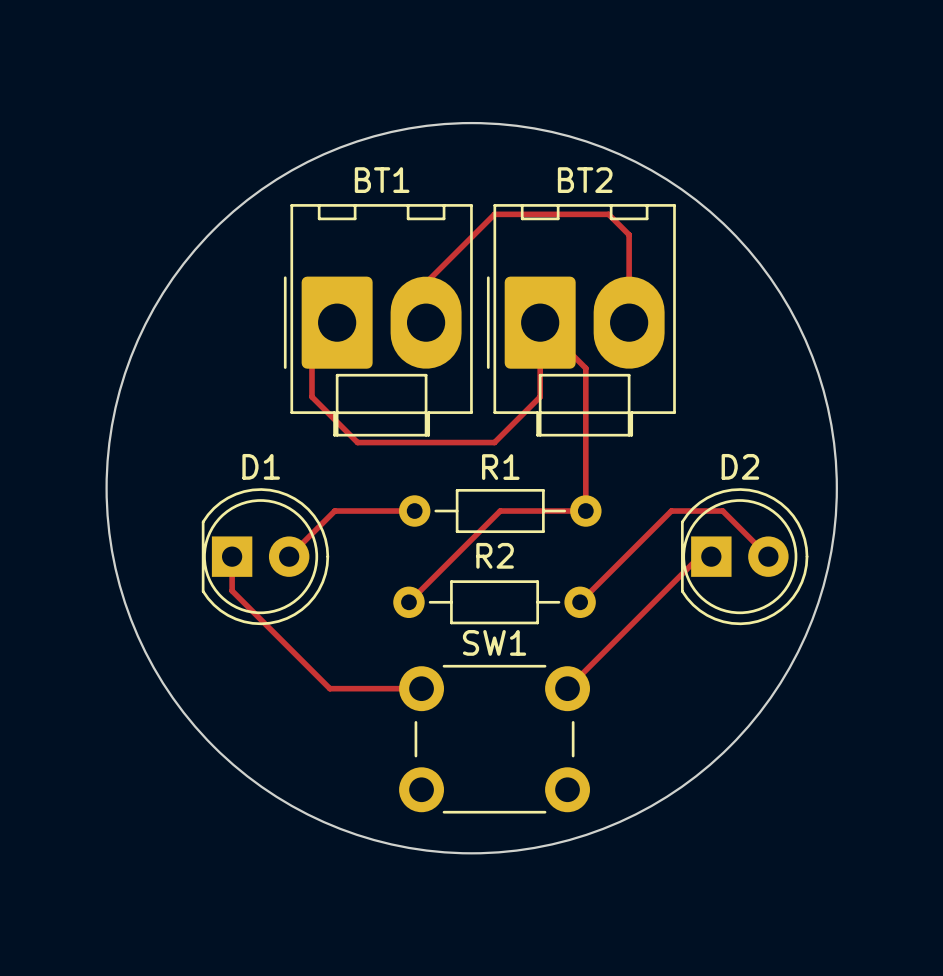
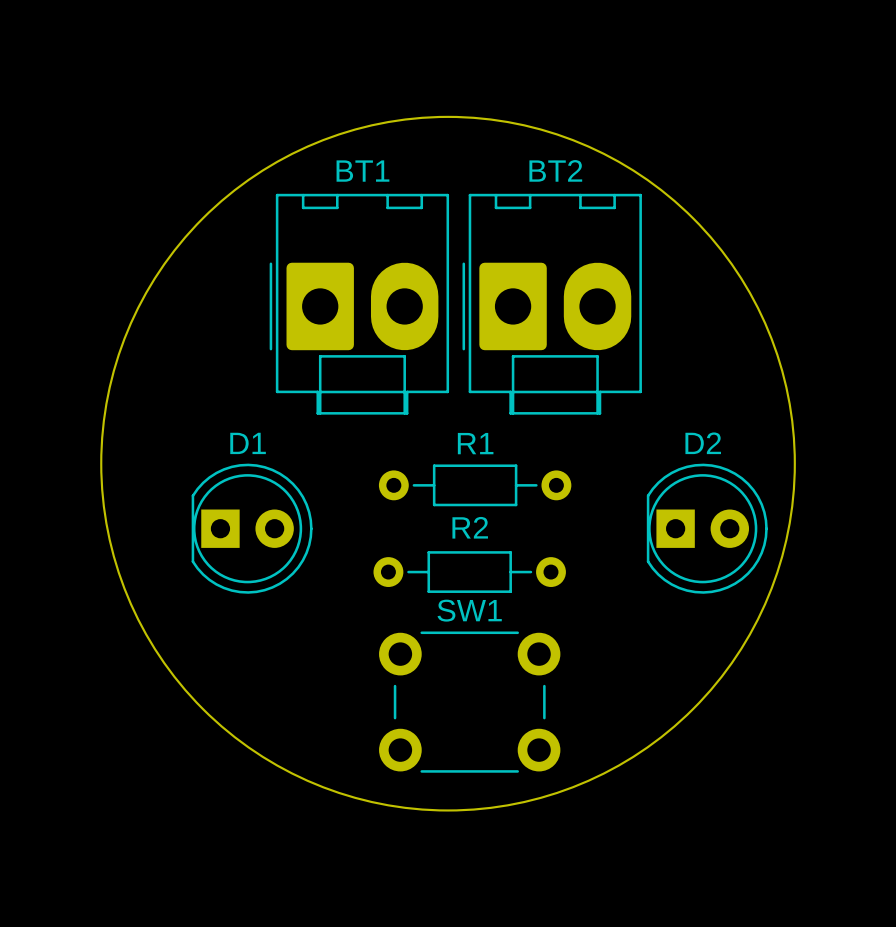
track: (337, 322) (311, 347) (311, 396) (357, 442) (494, 442) (540, 396) (540, 322) (585, 368) (585, 511) (500, 511) (408, 602) -> none
track: (426, 322) (426, 282) (494, 214) (608, 214) (629, 234) (629, 322) -> none
track: (414, 511) (334, 511) (289, 556) -> none
track: (232, 556) (232, 590) (329, 688) (421, 688) -> none
track: (711, 556) (699, 556) (567, 688) -> none
track: (768, 556) (722, 511) (671, 511) (580, 602) -> none

